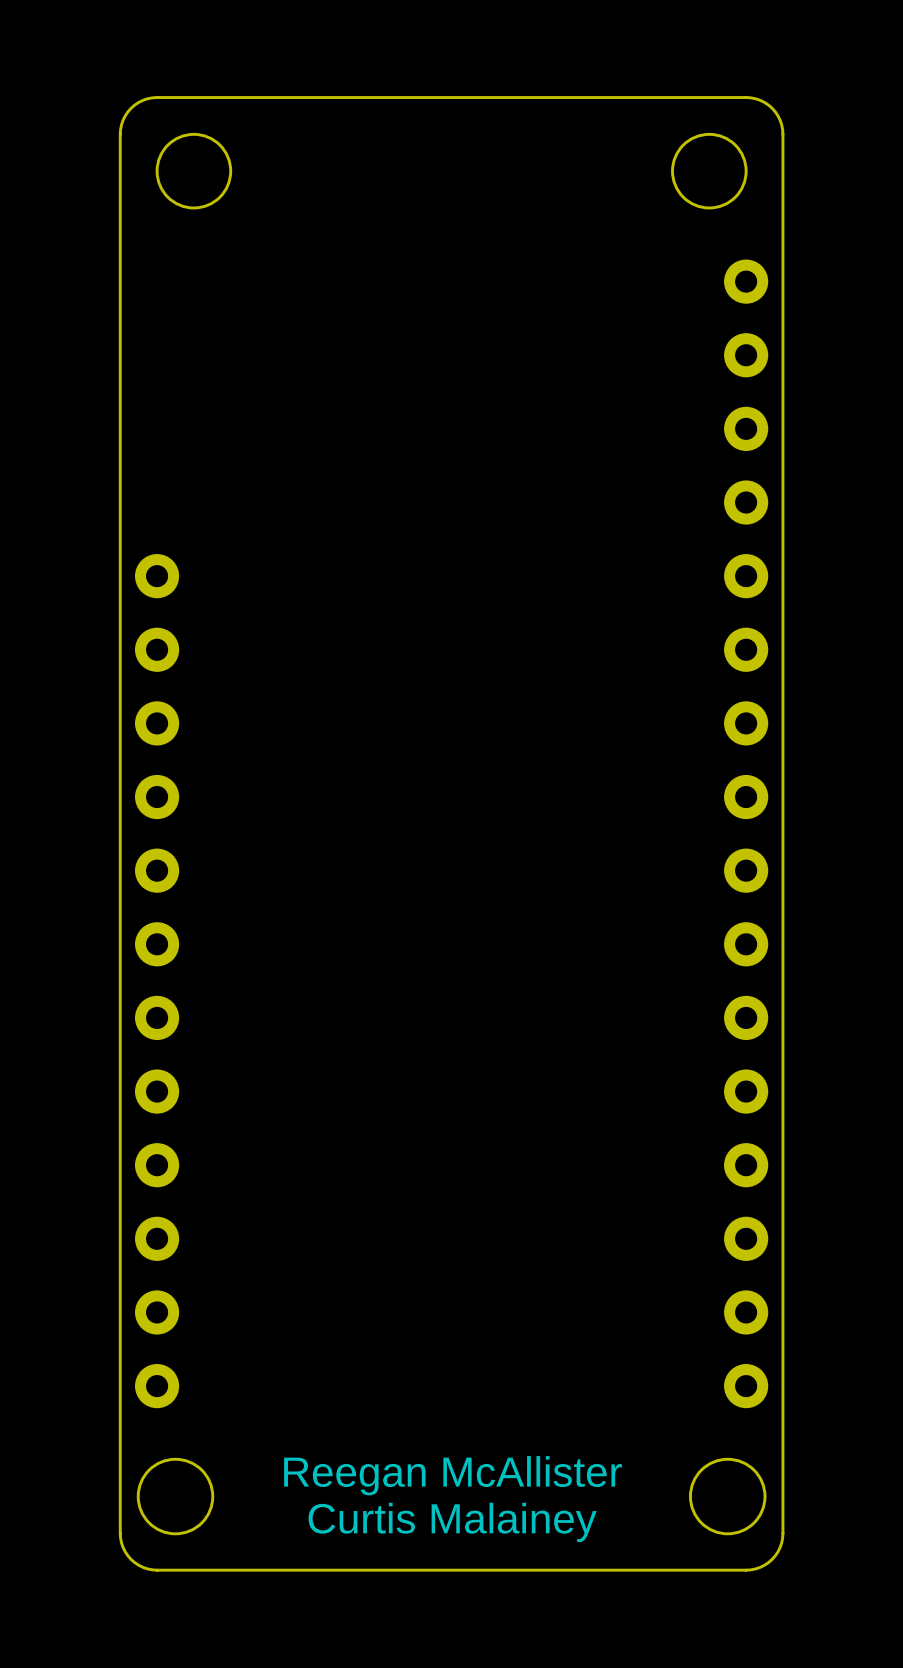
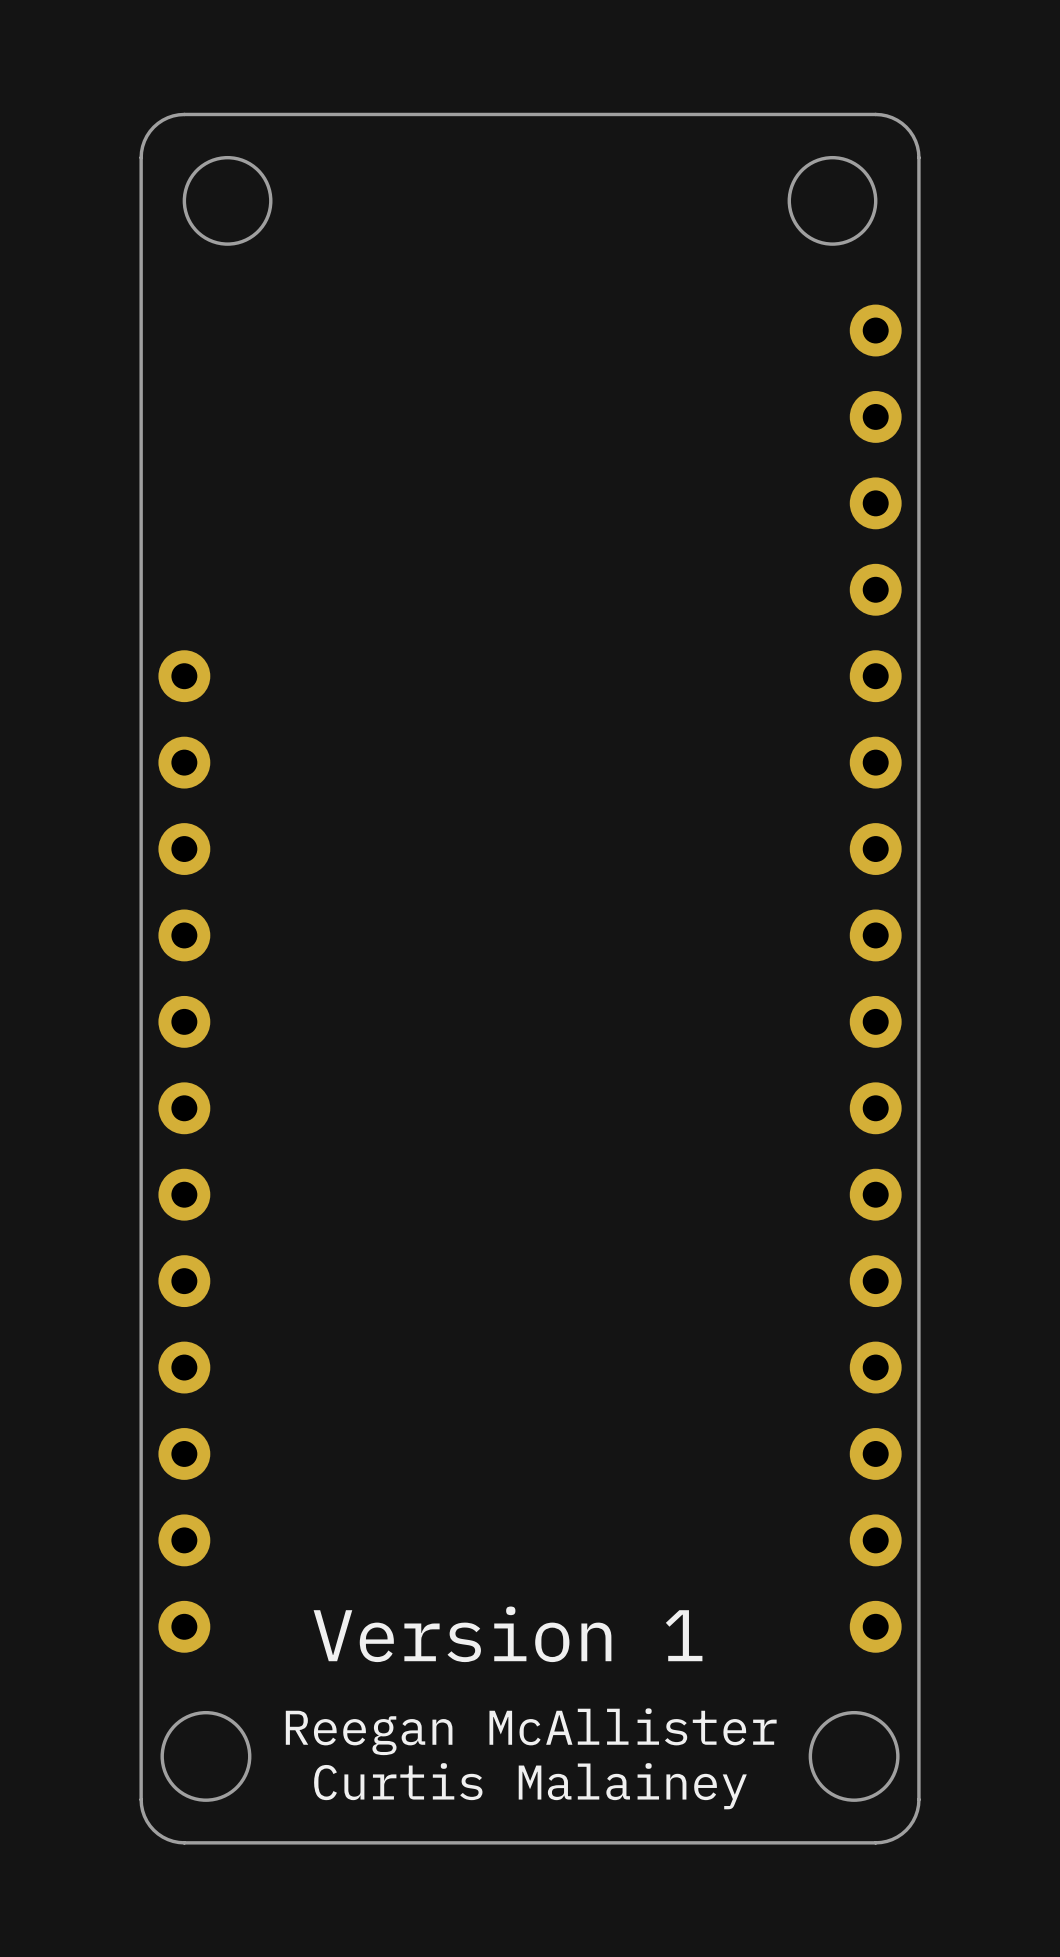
text: none -> Version 1 (508, 1634)

